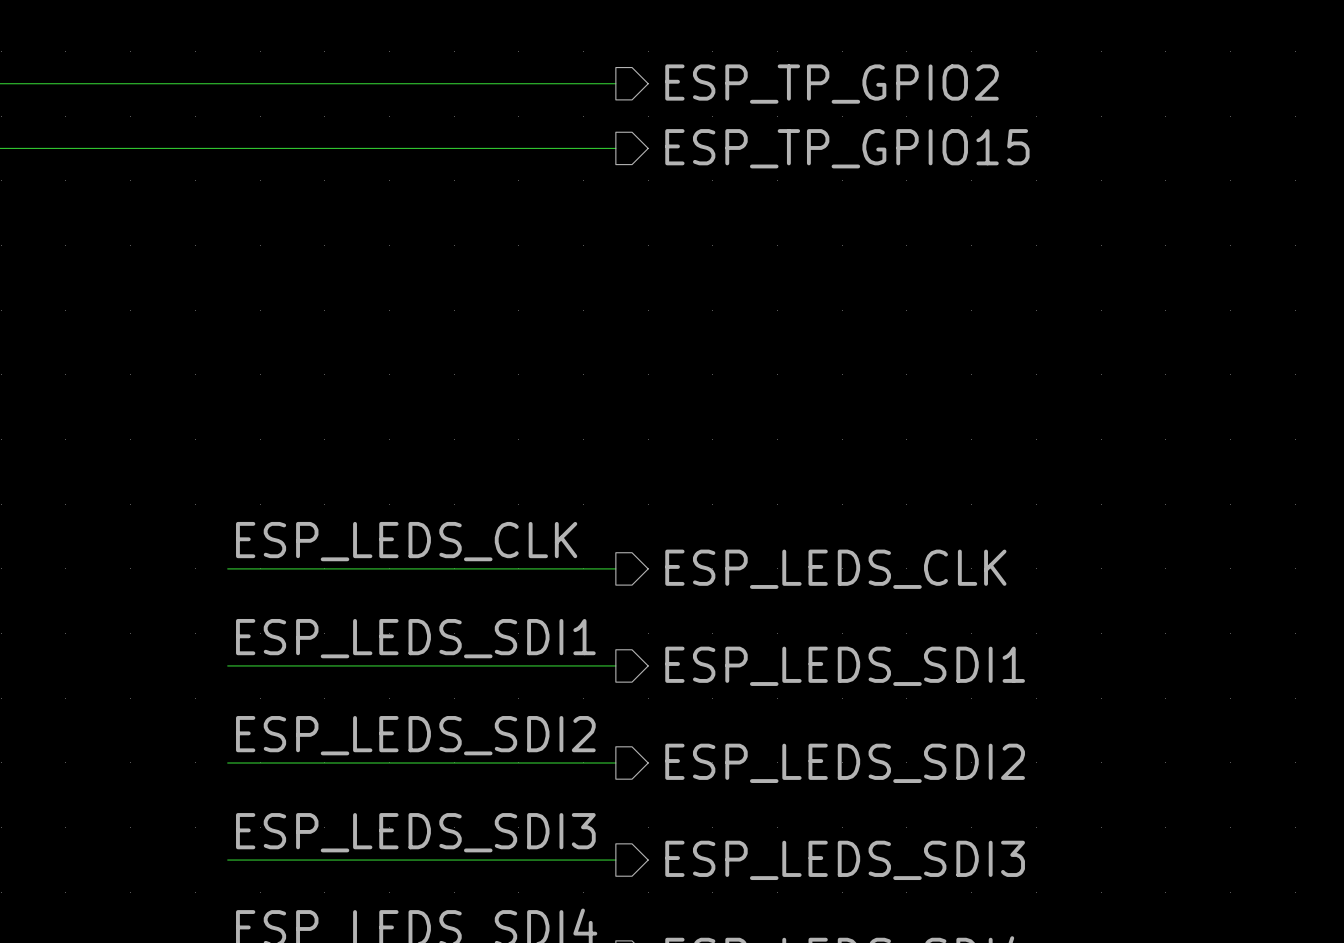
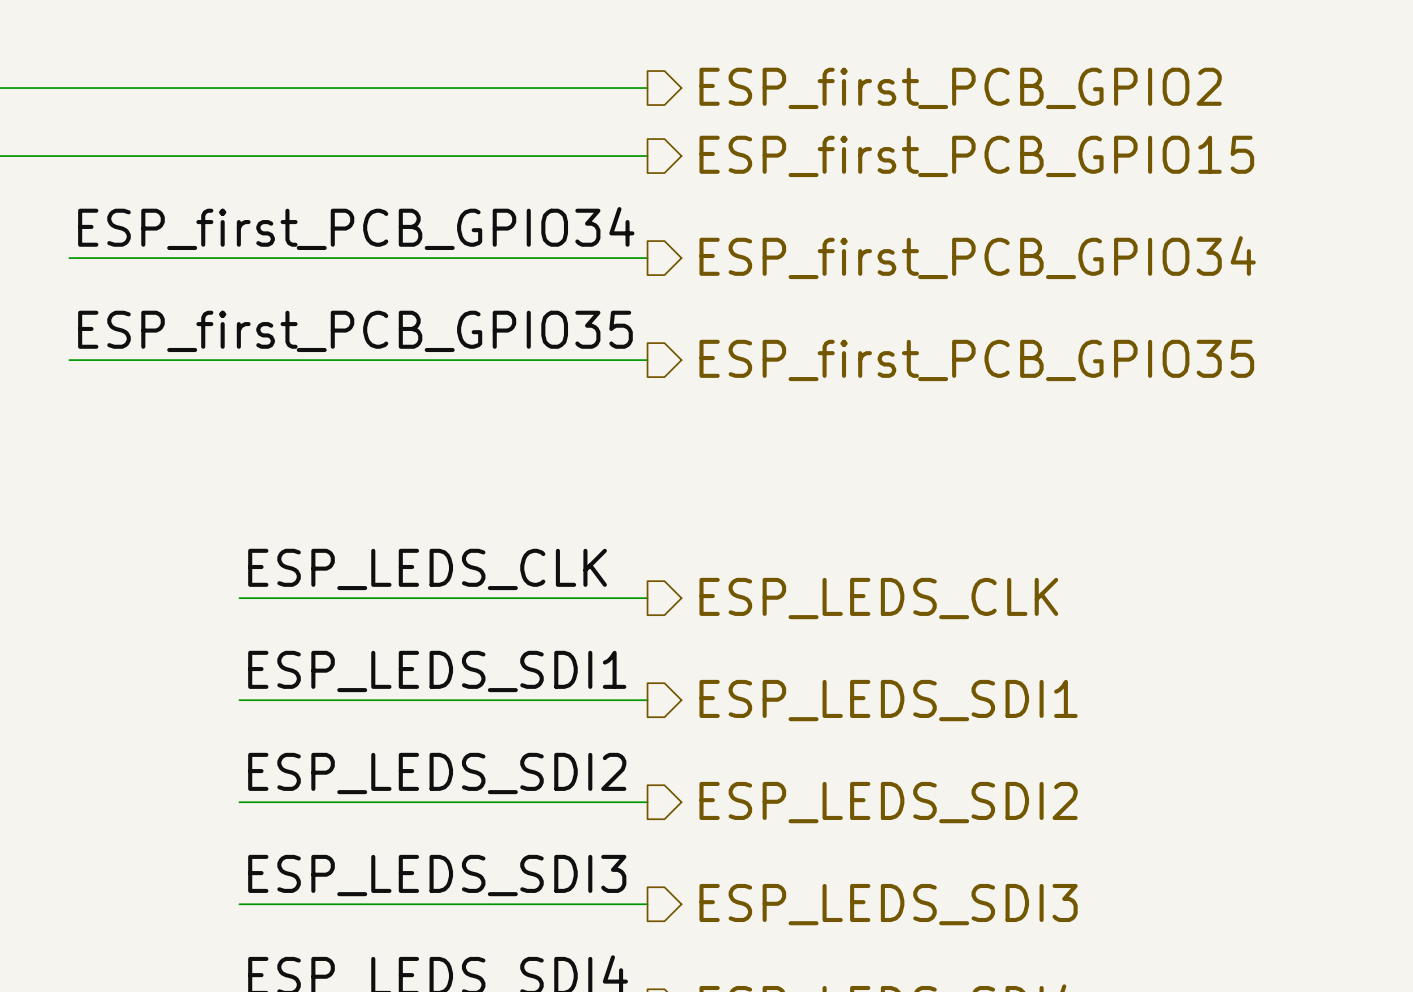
hierarchical label: ESP_TP_GPIO2 (832, 84) -> ESP_first_PCB_GPIO2 (960, 88)
hierarchical label: ESP_TP_GPIO15 (847, 148) -> ESP_first_PCB_GPIO15 (976, 156)
label: none -> ESP_first_PCB_GPIO34 (356, 228)
wire: none -> (69, 258) (647, 258)
hierarchical label: none -> ESP_first_PCB_GPIO34 (977, 257)
label: none -> ESP_first_PCB_GPIO35 (355, 331)
wire: none -> (69, 360) (647, 360)
hierarchical label: none -> ESP_first_PCB_GPIO35 (976, 360)

